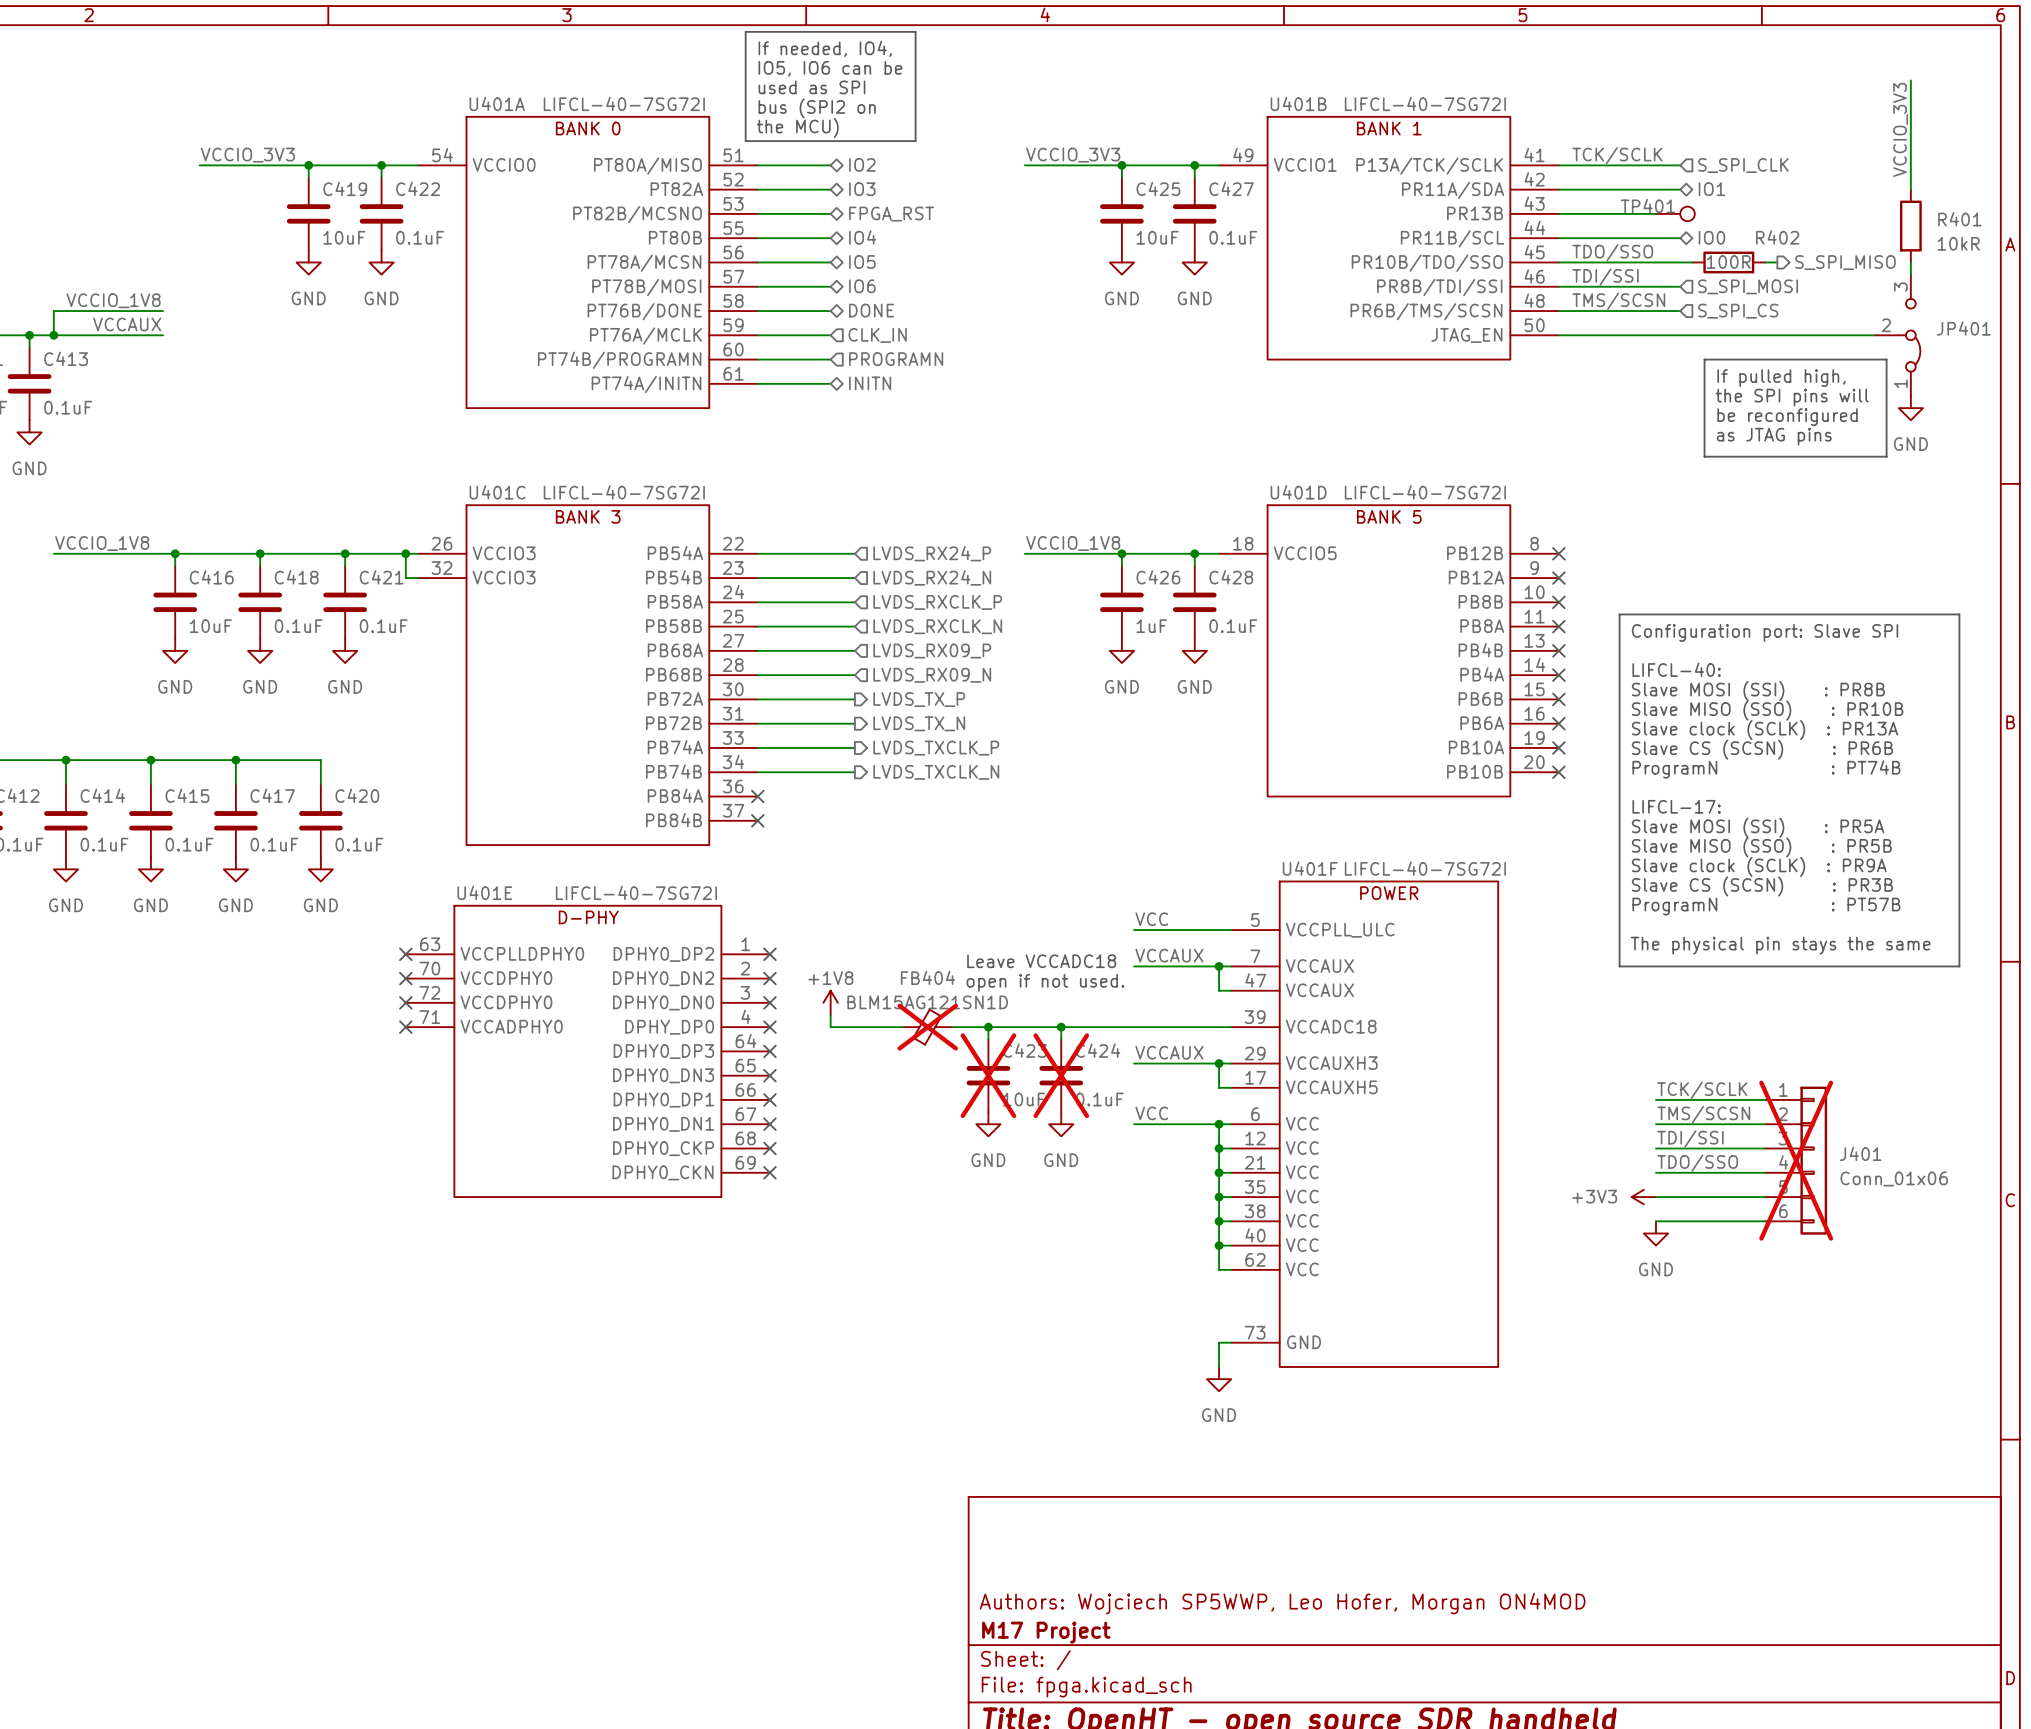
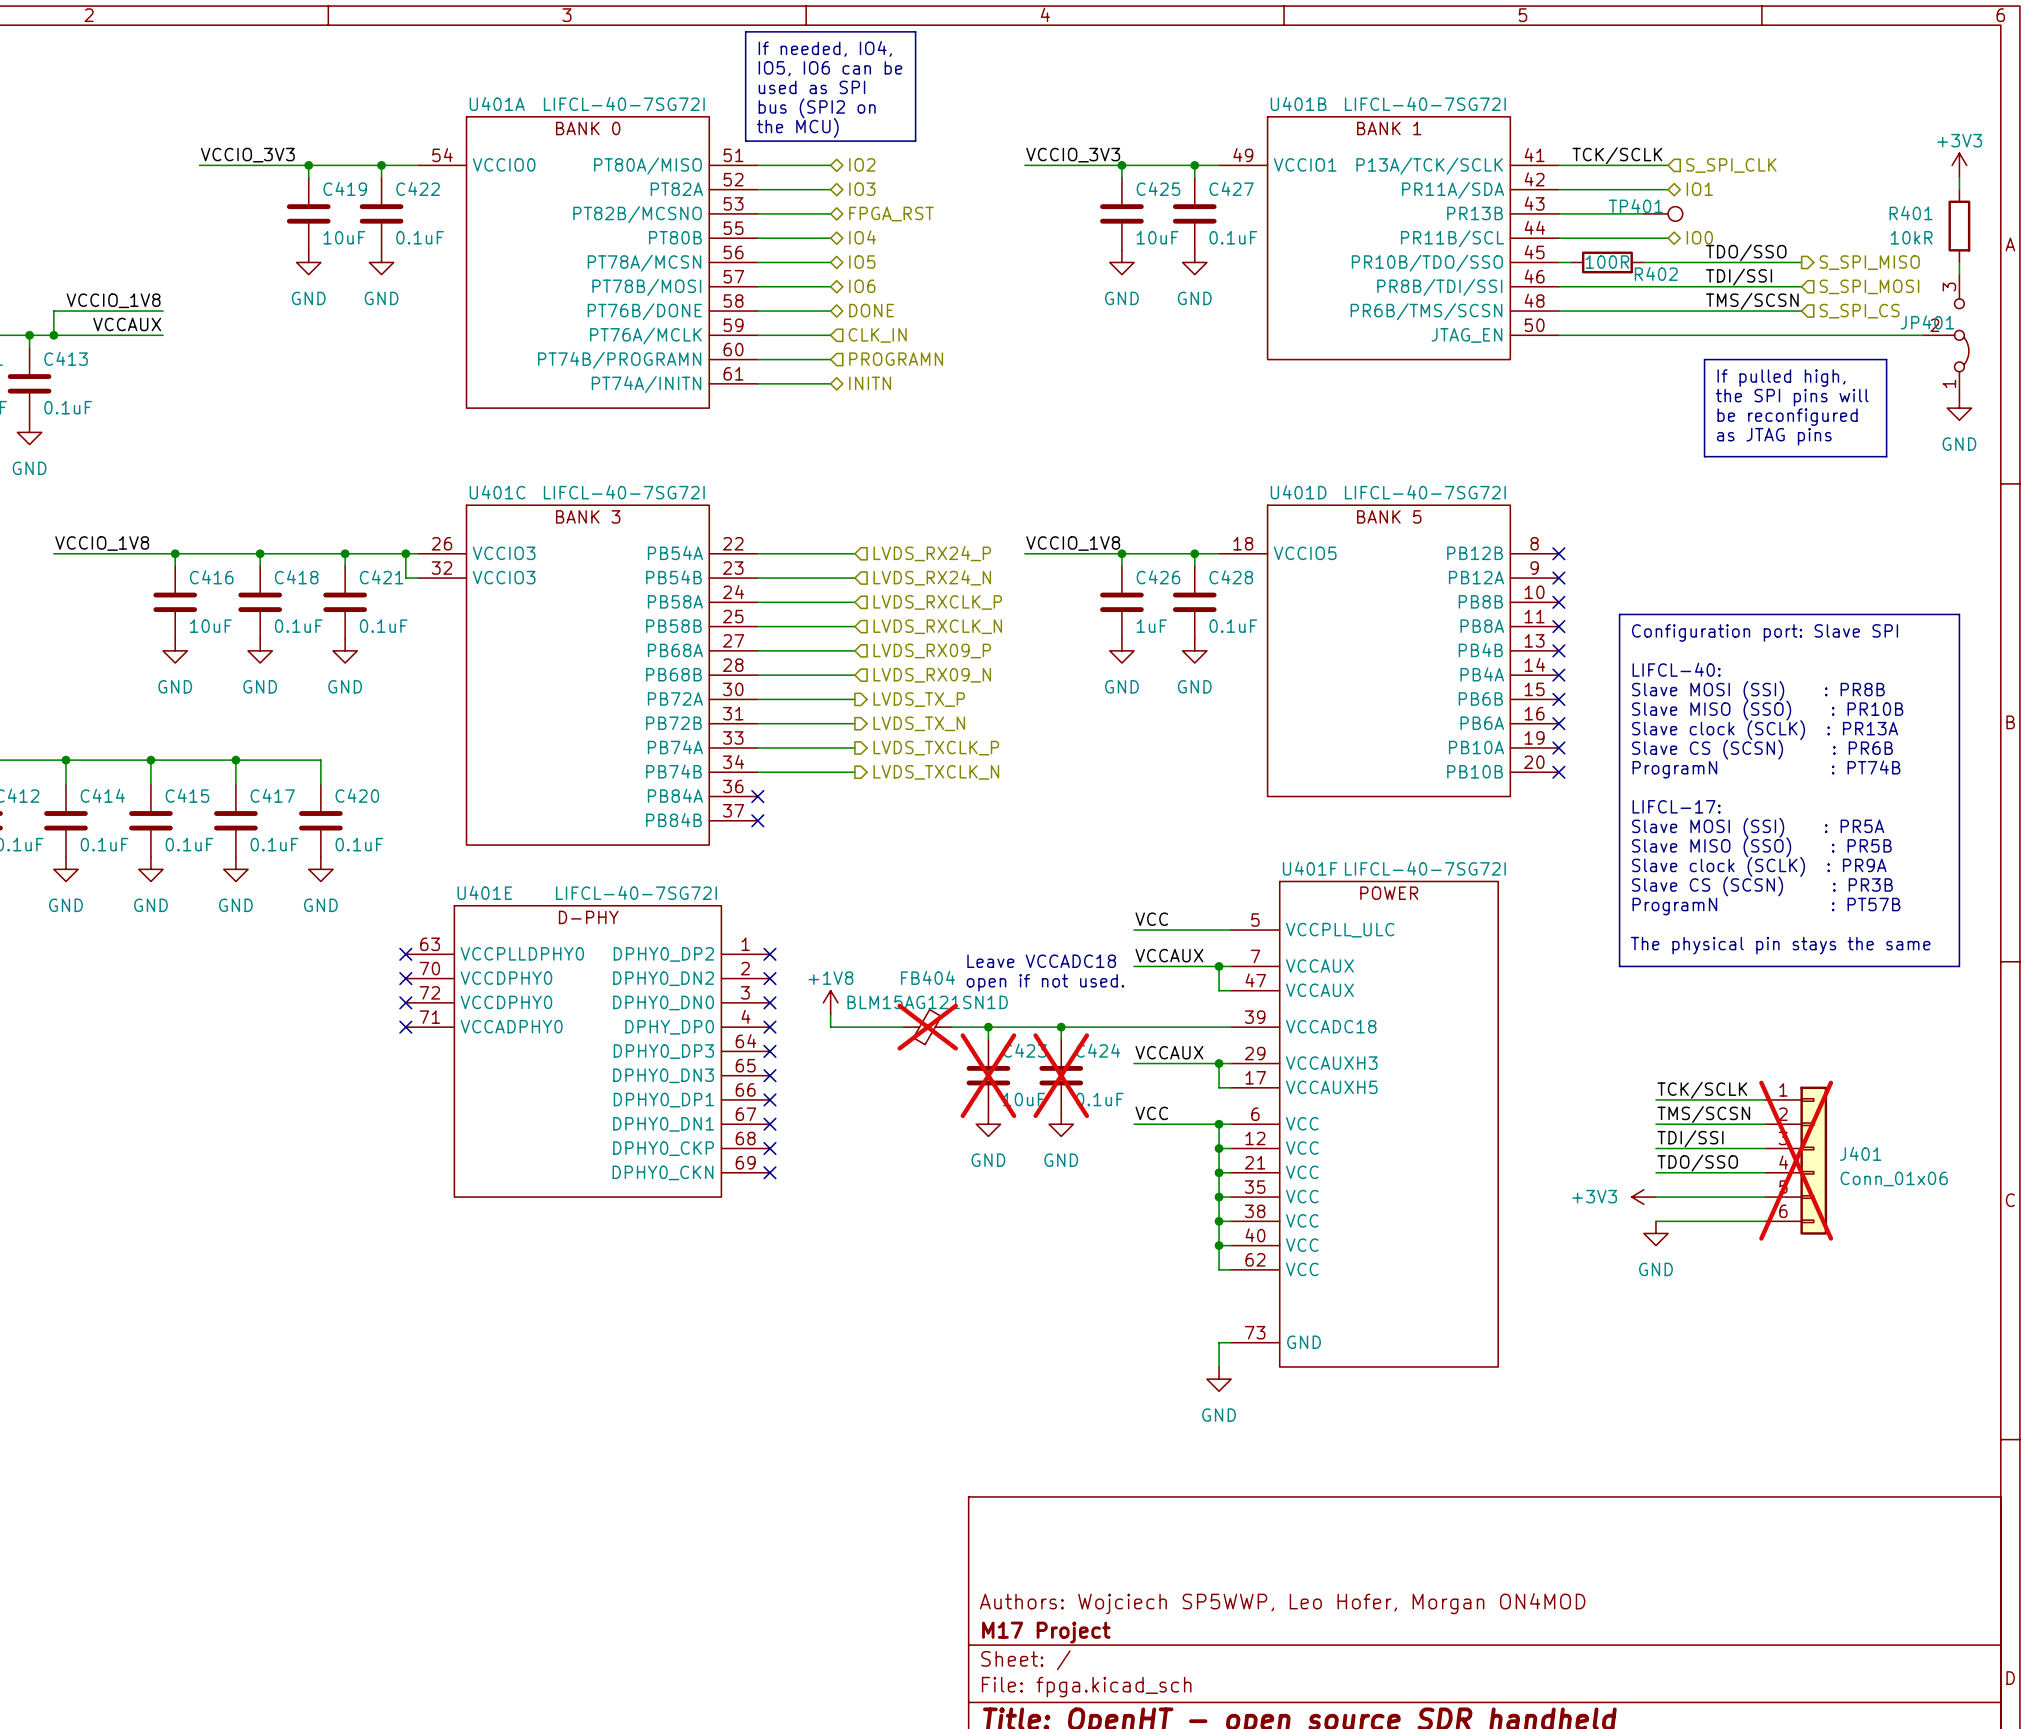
wire: (1910, 80) (1910, 189) -> none
label: VCCIO_3V3 (1900, 129) -> none
wire: (1668, 165) (1680, 165) -> none
hierarchical label position: S_SPI_CLK (1743, 165) -> S_SPI_CLK (1731, 165)
power symbol: none -> +3V3 (1959, 165)
wire: none -> (1959, 177) (1959, 189)
wire: (1668, 189) (1680, 189) -> none
hierarchical label position: IO1 (1711, 189) -> IO1 (1699, 189)
TP401 position: (1675, 213) -> (1663, 213)
R401 name position: R401 (1959, 219) -> R401 (1911, 213)
R401 position: (1910, 226) -> (1959, 226)
hierarchical label position: IO0 (1711, 237) -> IO0 (1699, 237)
R402 name position: R402 (1777, 237) -> R402 (1656, 273)
wire: (1668, 238) (1680, 238) -> none
R401 value position: 10kR (1958, 243) -> 10kR (1911, 237)
label position: TDO/SSO (1612, 252) -> TDO/SSO (1746, 252)
R402 position: (1728, 262) -> (1607, 262)
wire: none -> (1777, 262) (1801, 262)
hierarchical label position: S_SPI_MISO (1845, 262) -> S_SPI_MISO (1869, 262)
wire: (1910, 262) (1910, 274) -> (1959, 262) (1959, 274)
label position: TDI/SSI (1605, 277) -> TDI/SSI (1739, 277)
wire: none -> (1680, 286) (1801, 286)
hierarchical label position: S_SPI_MOSI (1748, 286) -> S_SPI_MOSI (1869, 286)
label position: TMS/SCSN (1618, 301) -> TMS/SCSN (1752, 301)
wire: none -> (1680, 311) (1801, 311)
hierarchical label position: S_SPI_CS (1738, 311) -> S_SPI_CS (1859, 311)
JP401 name position: JP401 (1963, 328) -> JP401 (1927, 322)
JP401 position: (1897, 335) -> (1945, 335)
power symbol position: GND (1910, 408) -> GND (1959, 408)

